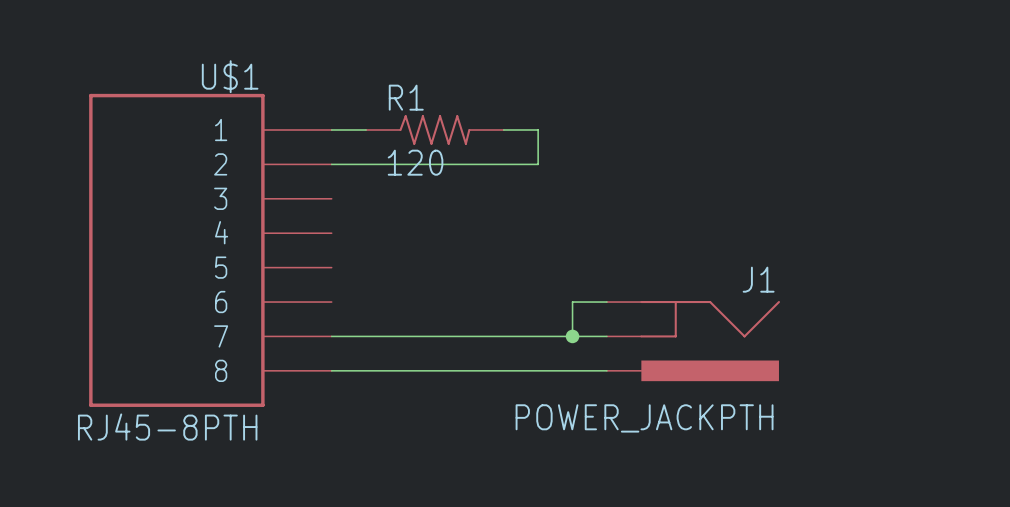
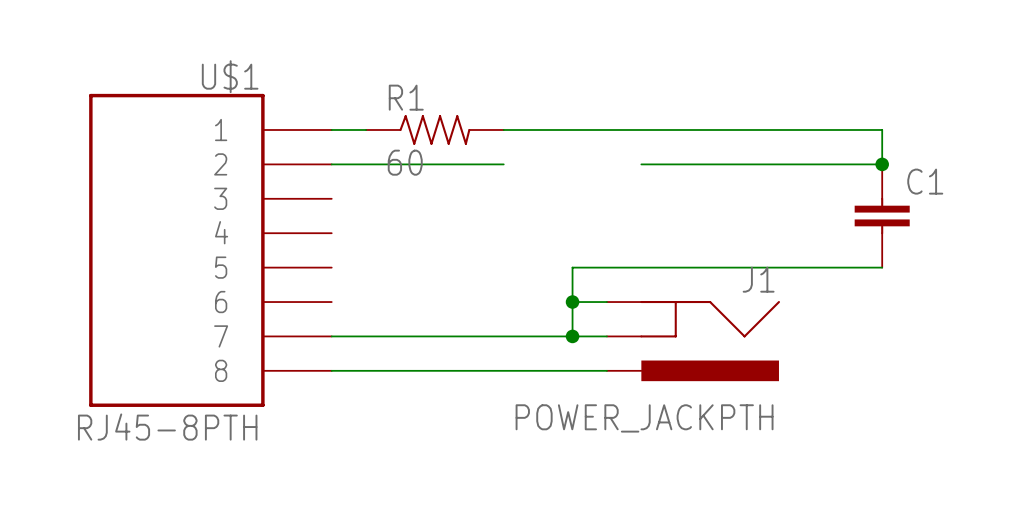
wire: (538, 129) (538, 164) (503, 164) -> (538, 129) (882, 129) (882, 164) (641, 164)
R1 value: 120 (415, 162) -> 60 (405, 162)
junction: none -> (882, 164)
C1: none -> (882, 216)
wire: none -> (882, 267) (572, 267) (572, 302)
junction: none -> (572, 302)

